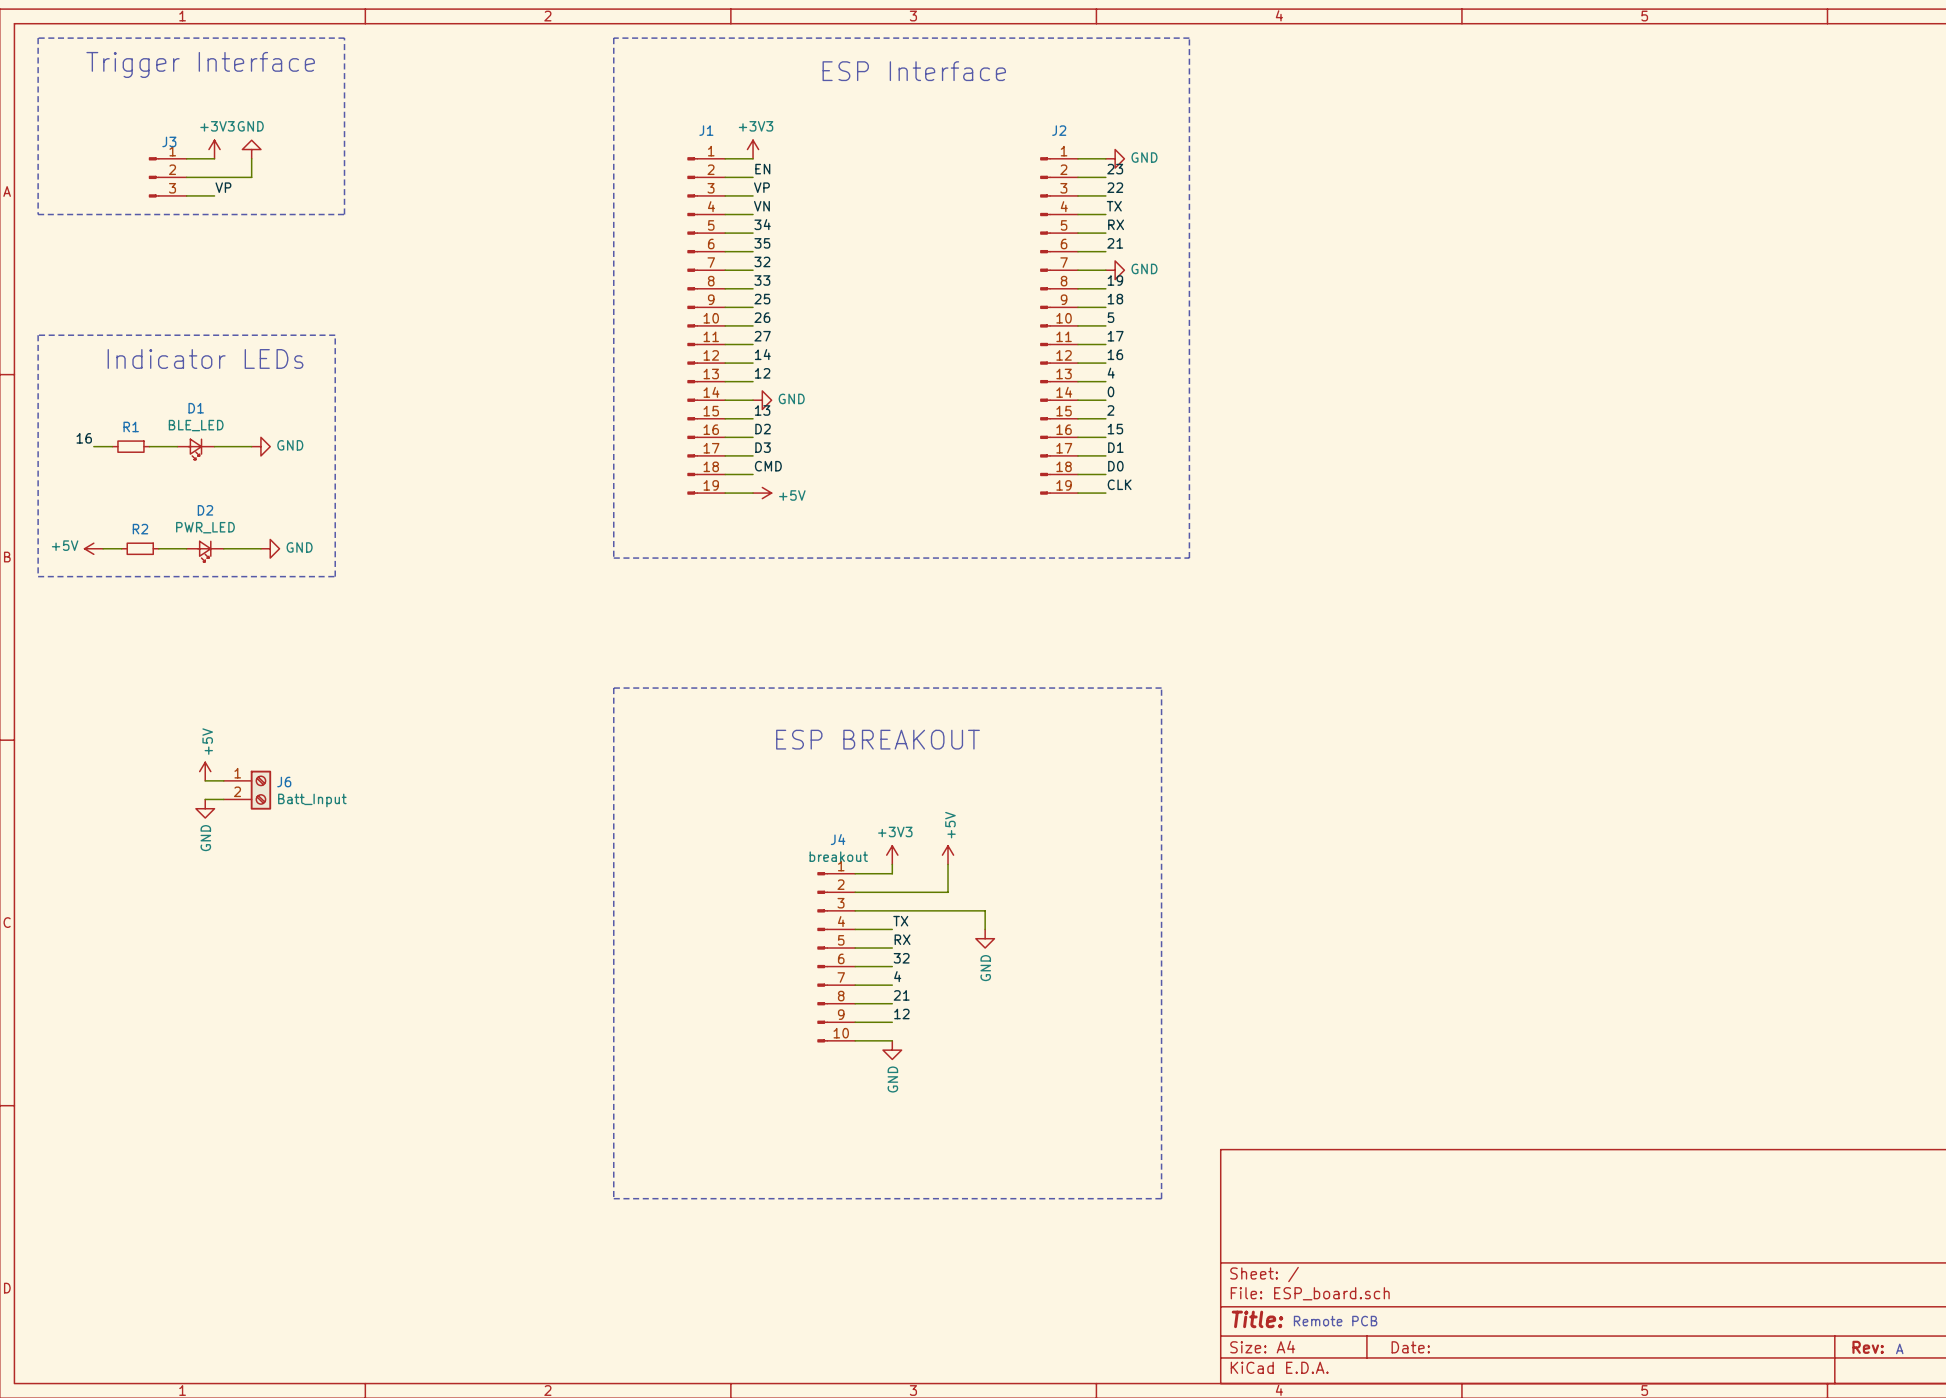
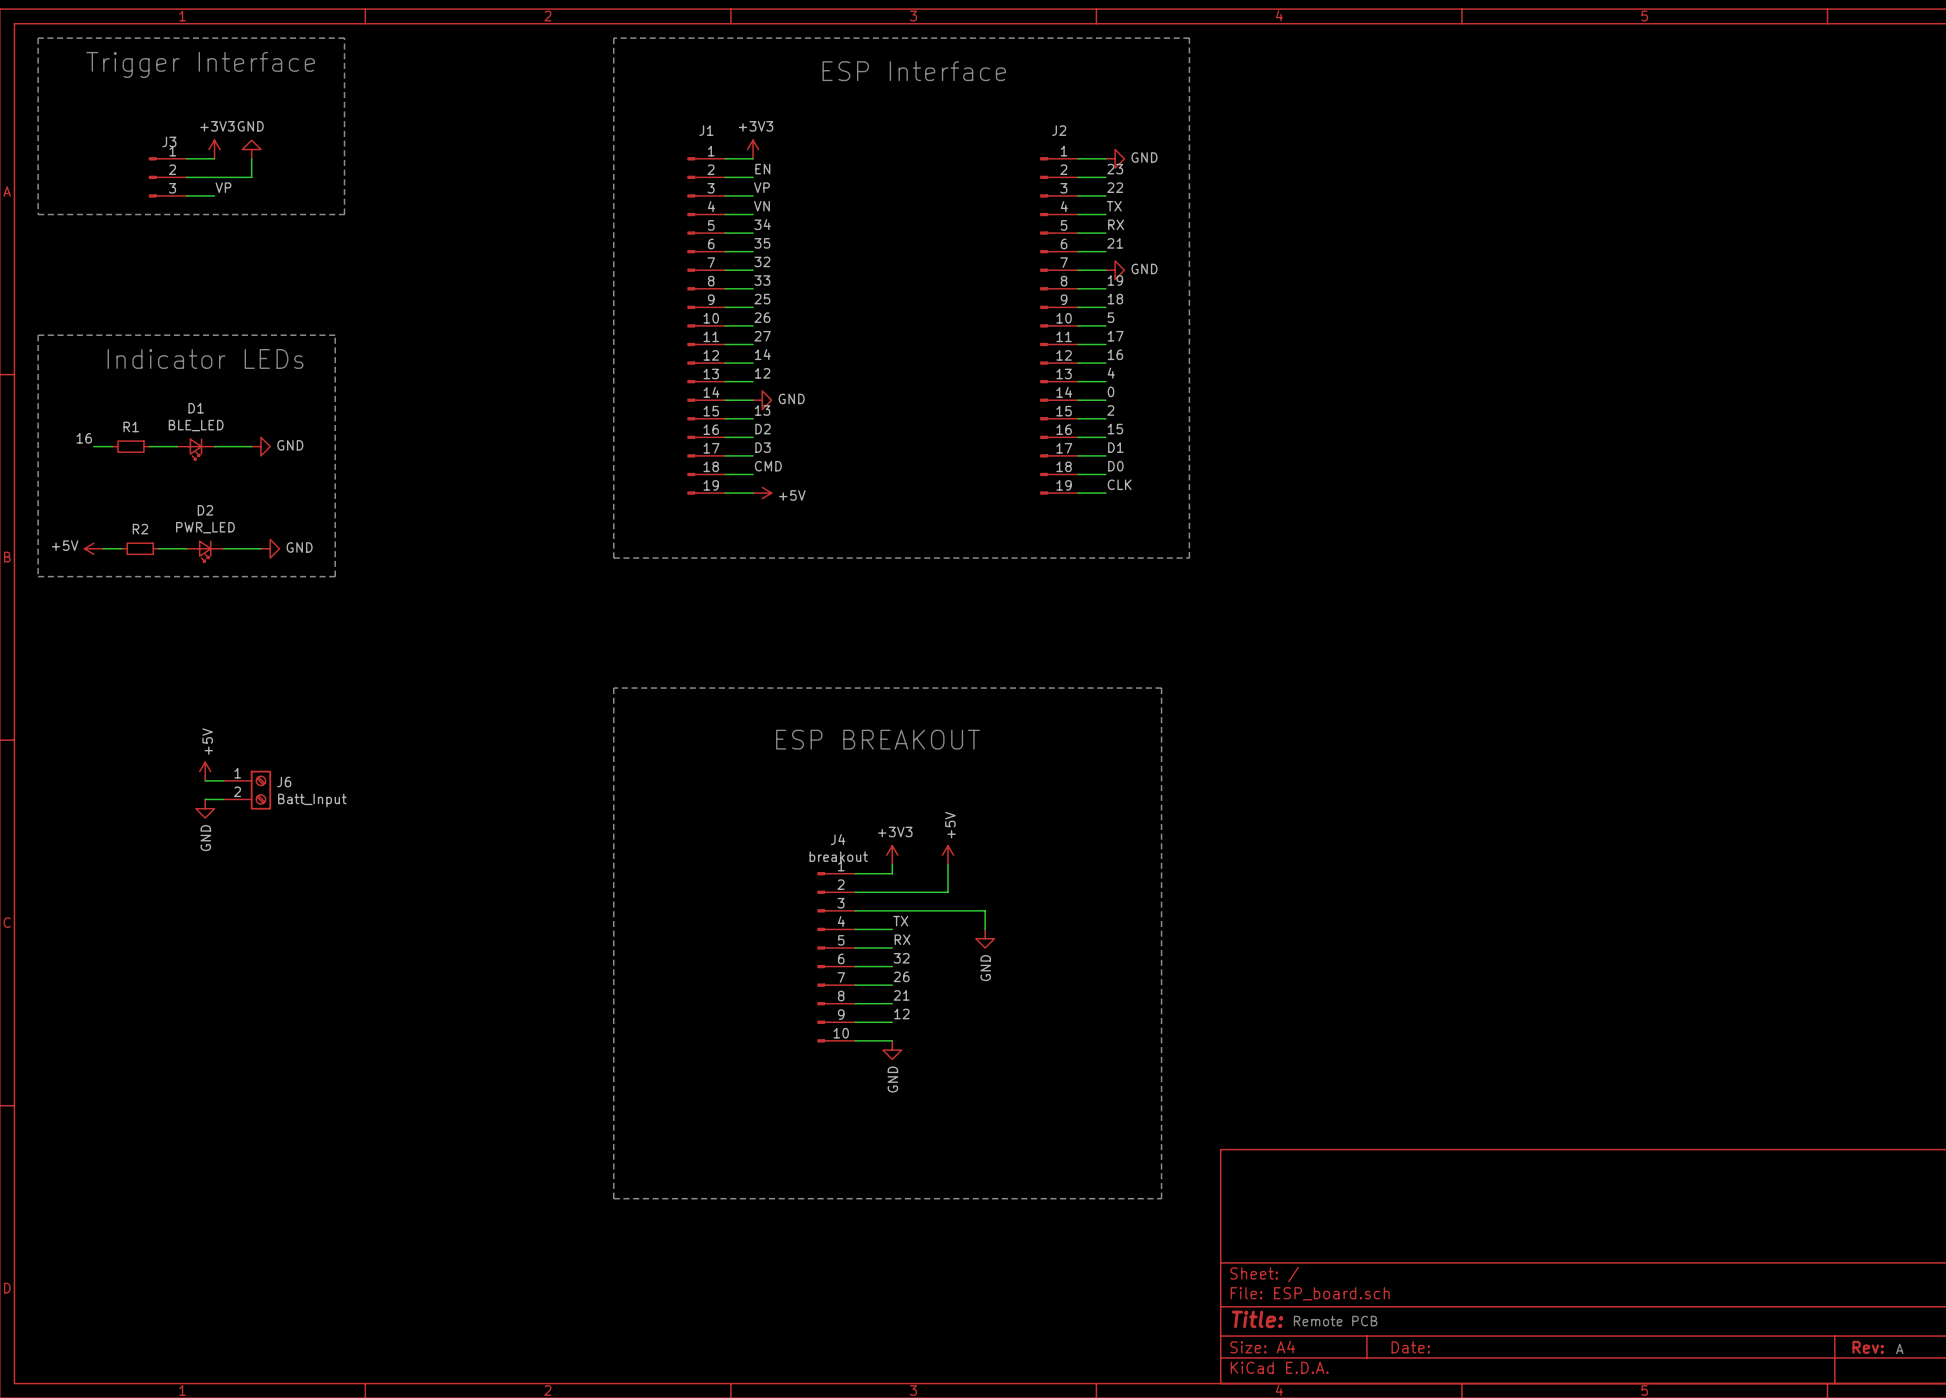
label: 4 (897, 976) -> 26 (901, 976)

